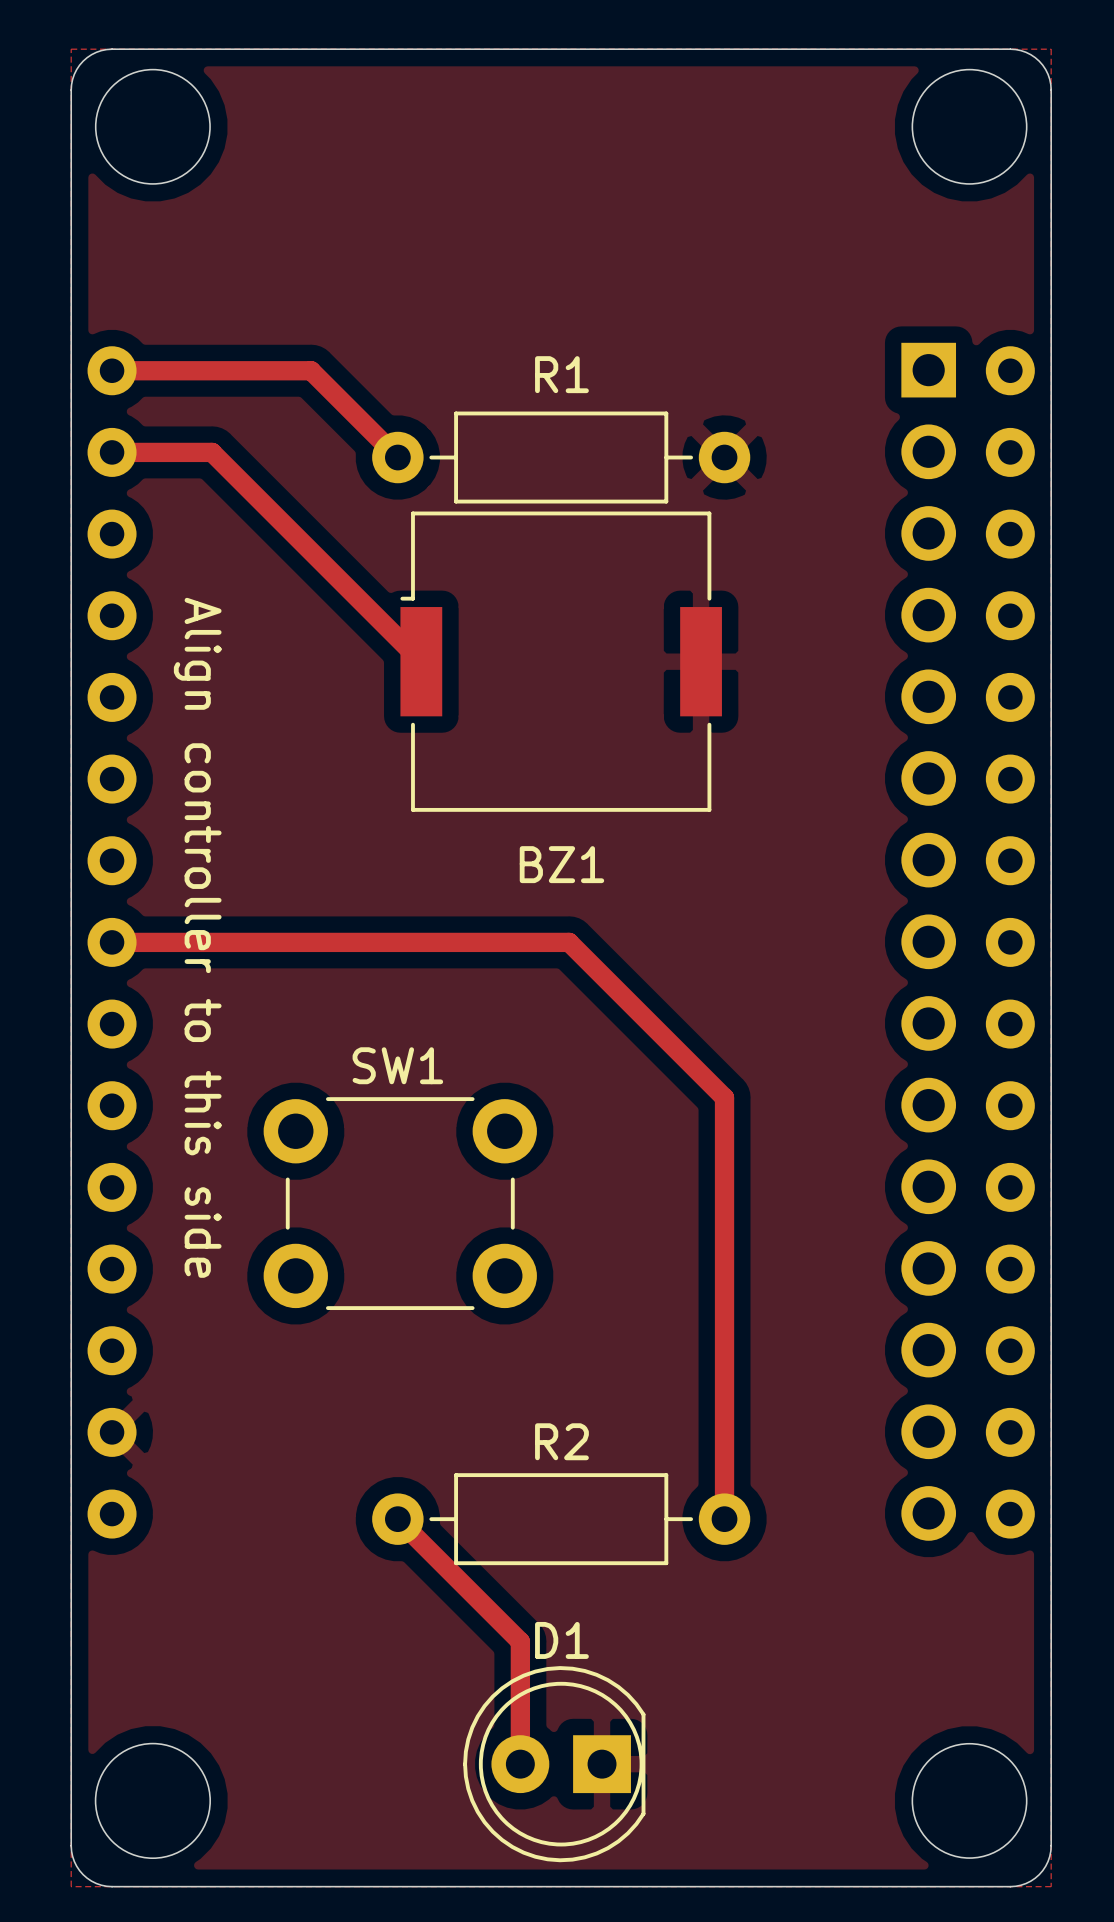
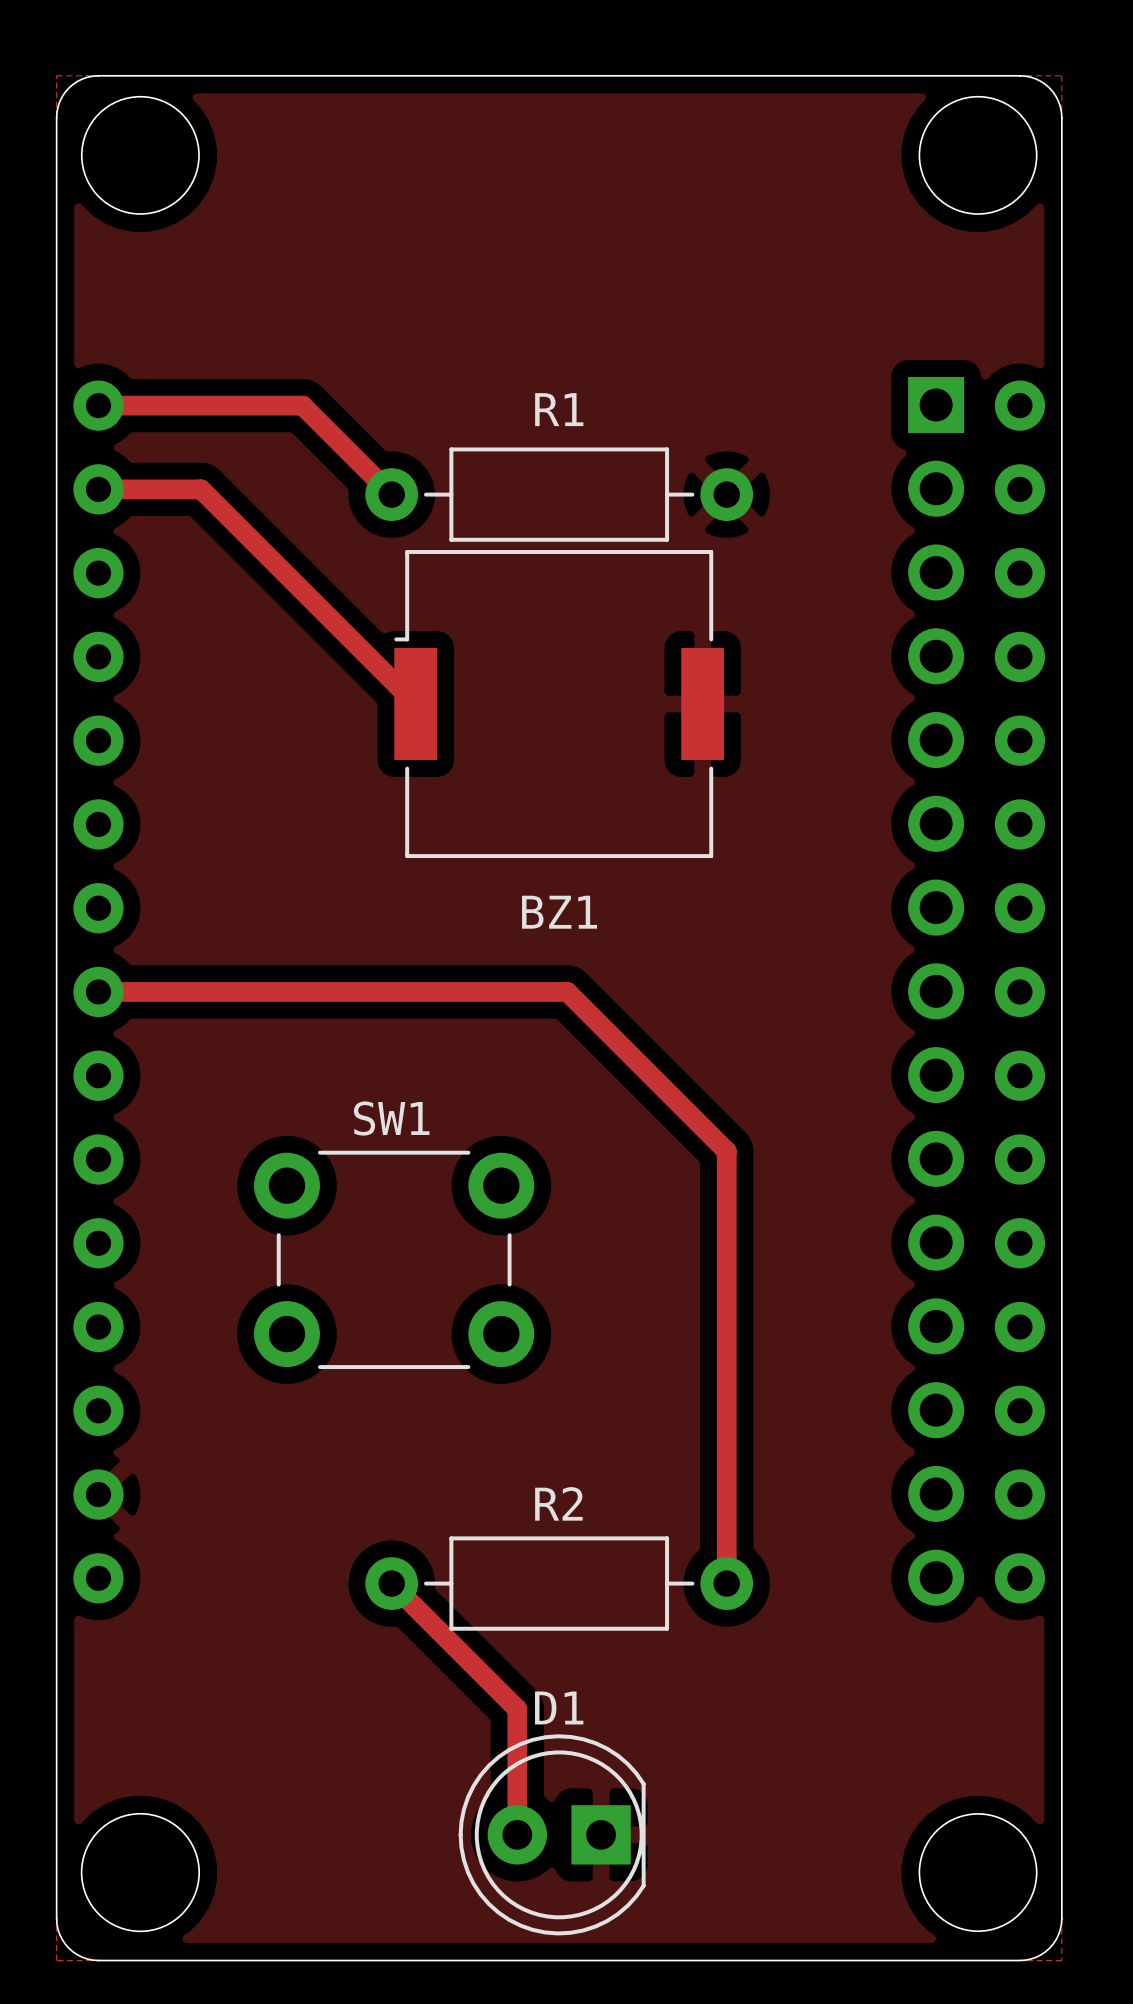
text: Align controller to this side (197, 937) -> none

